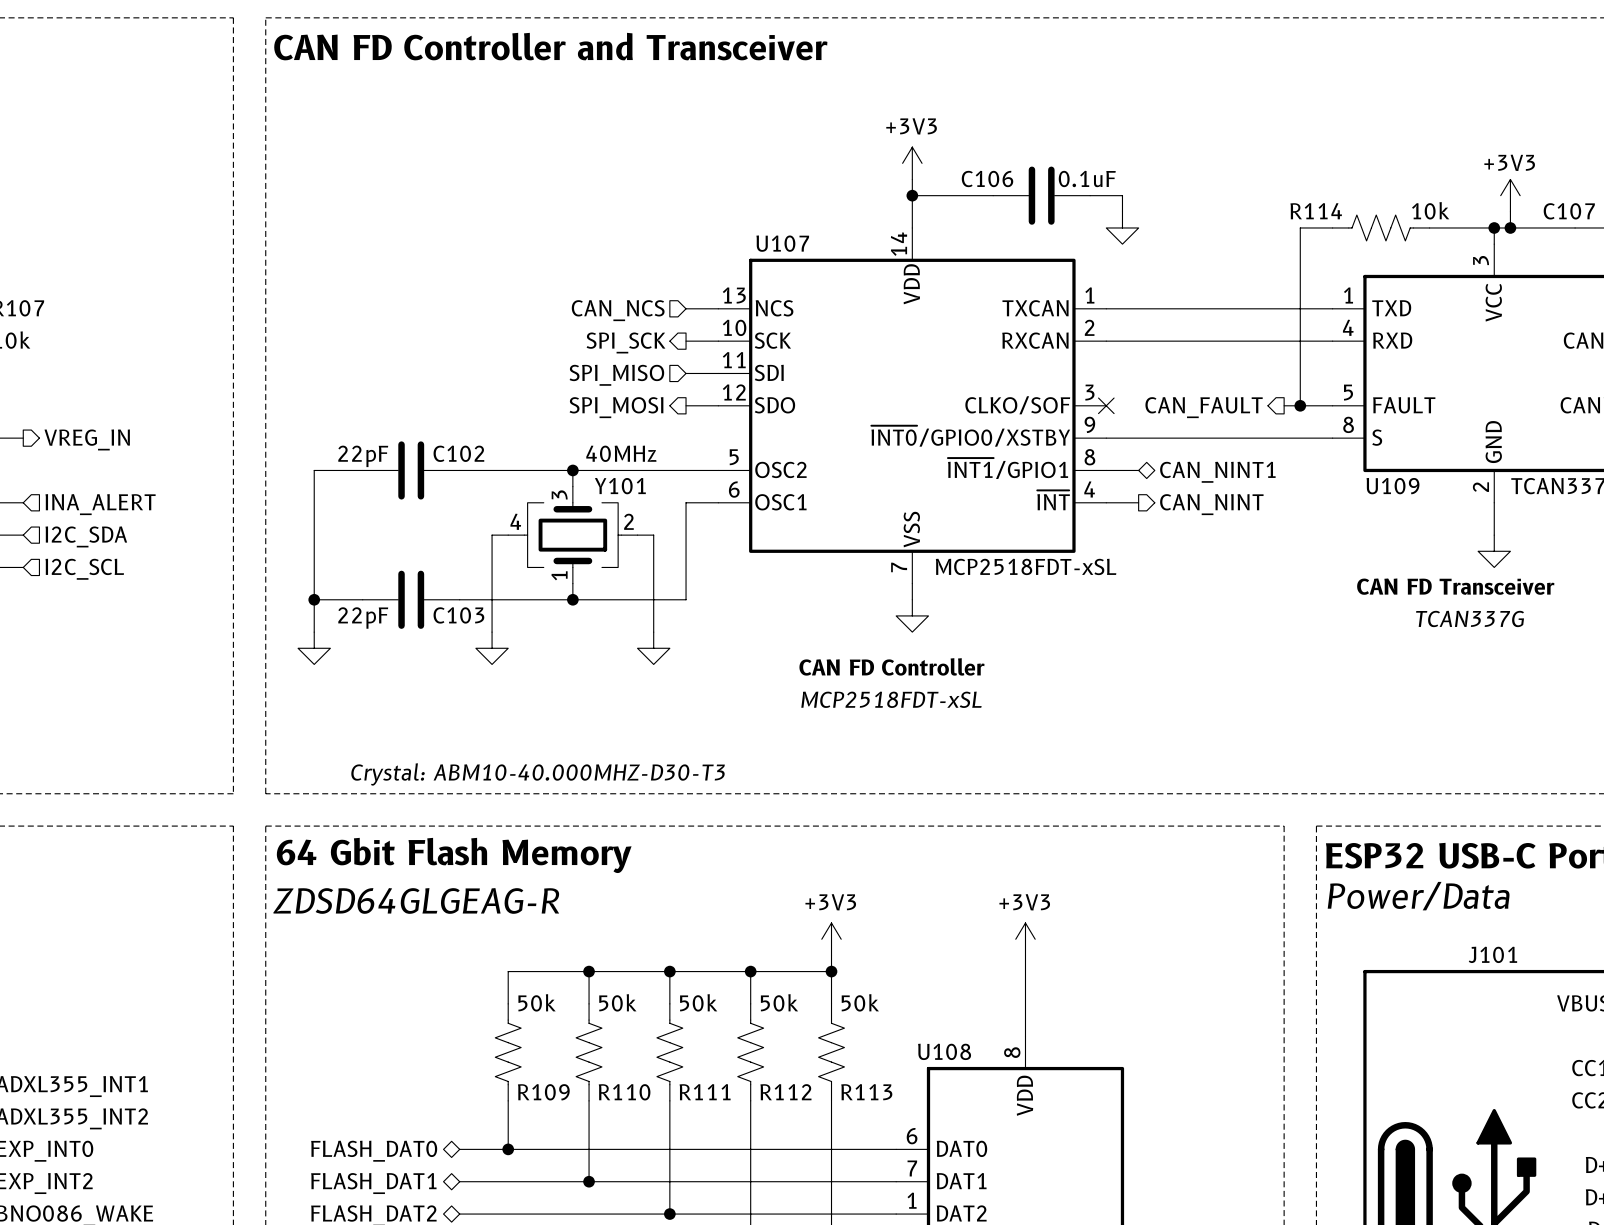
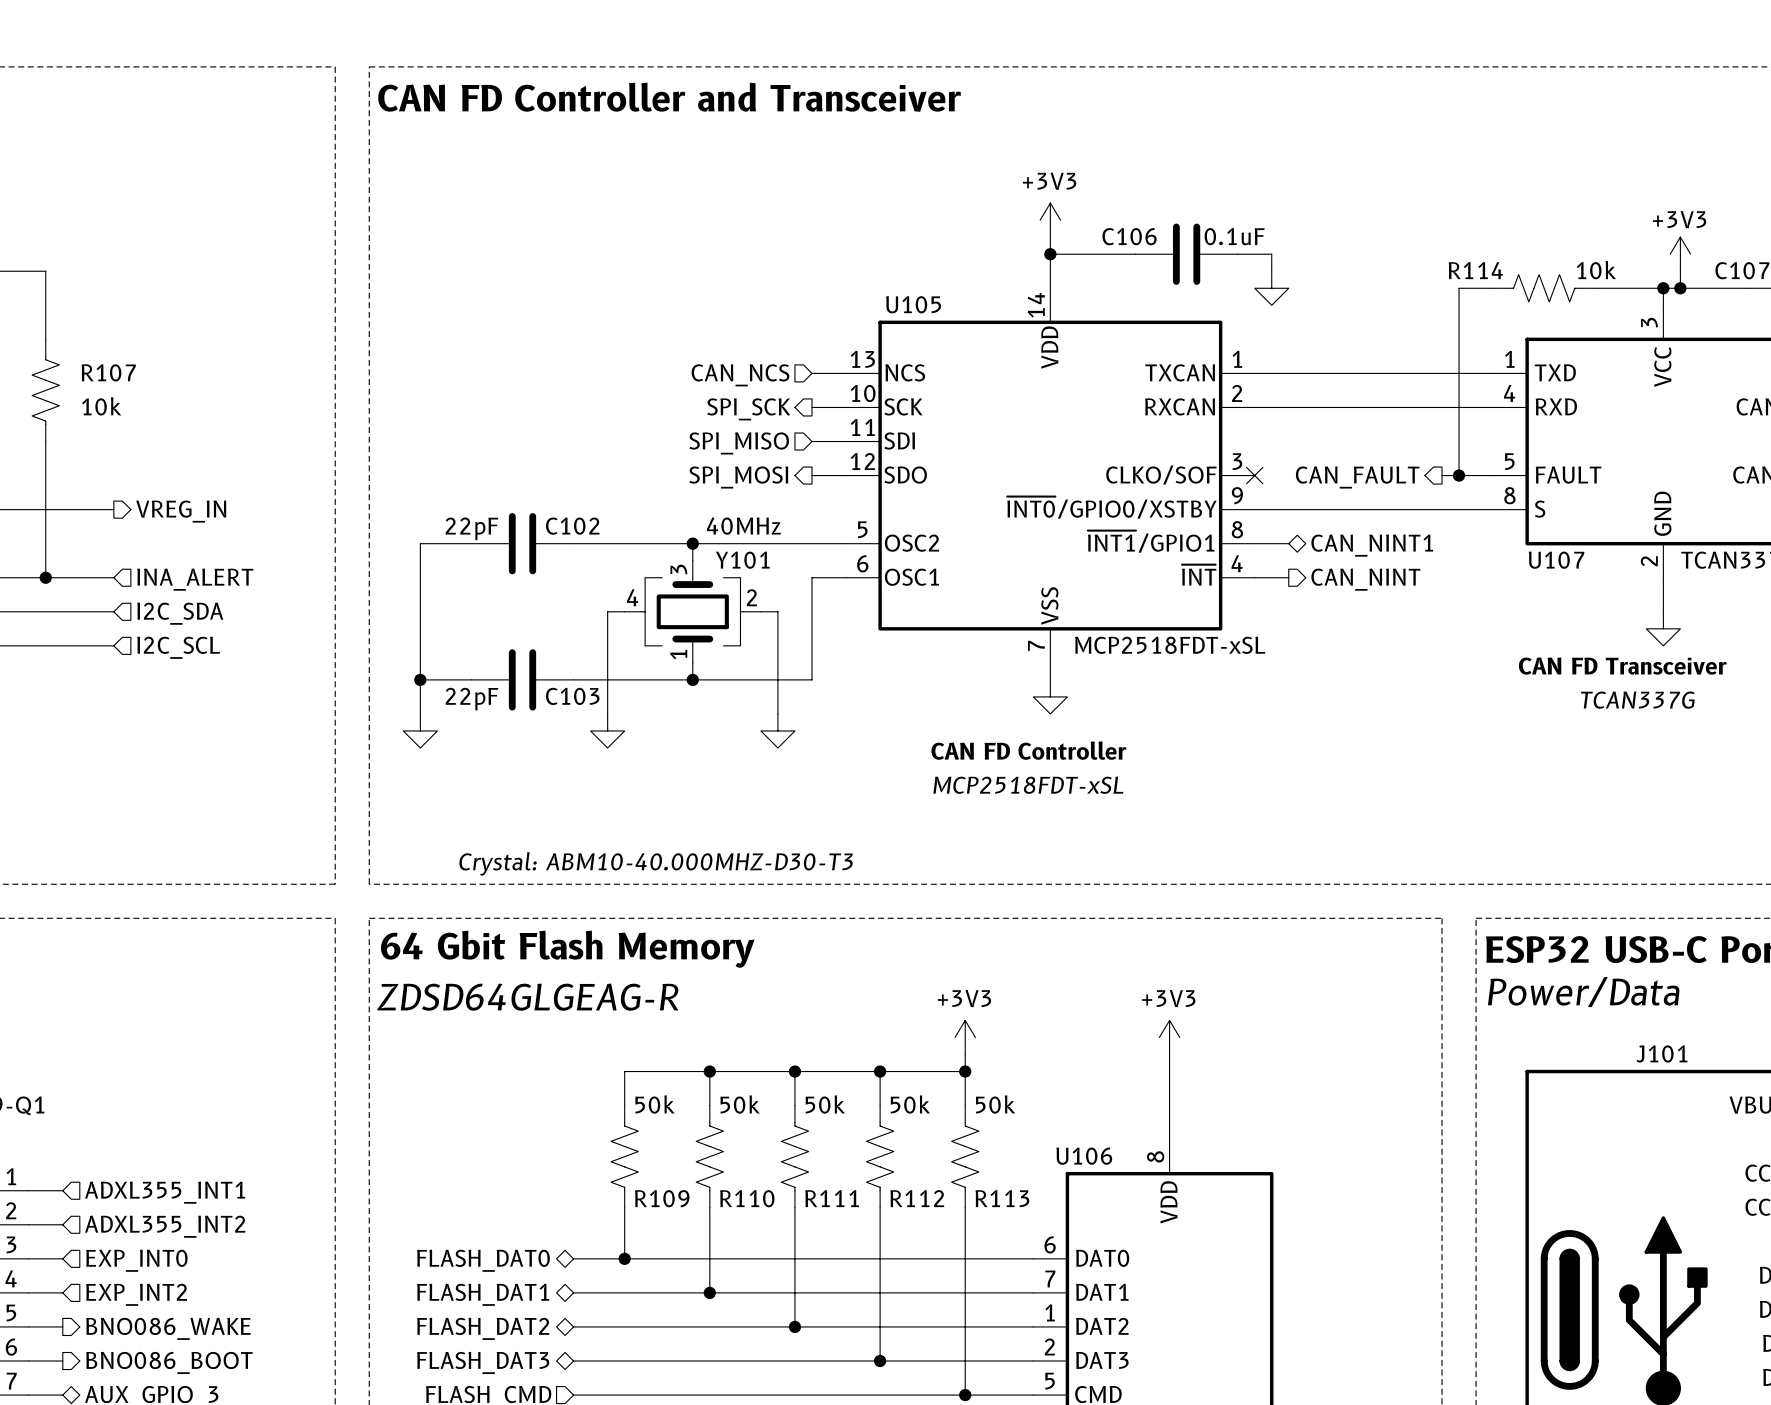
U107 name: U107 (782, 243) -> U105 (913, 304)
U109 name: U109 (1392, 486) -> U107 (1556, 560)
U108 name: U108 (944, 1051) -> U106 (1084, 1156)

